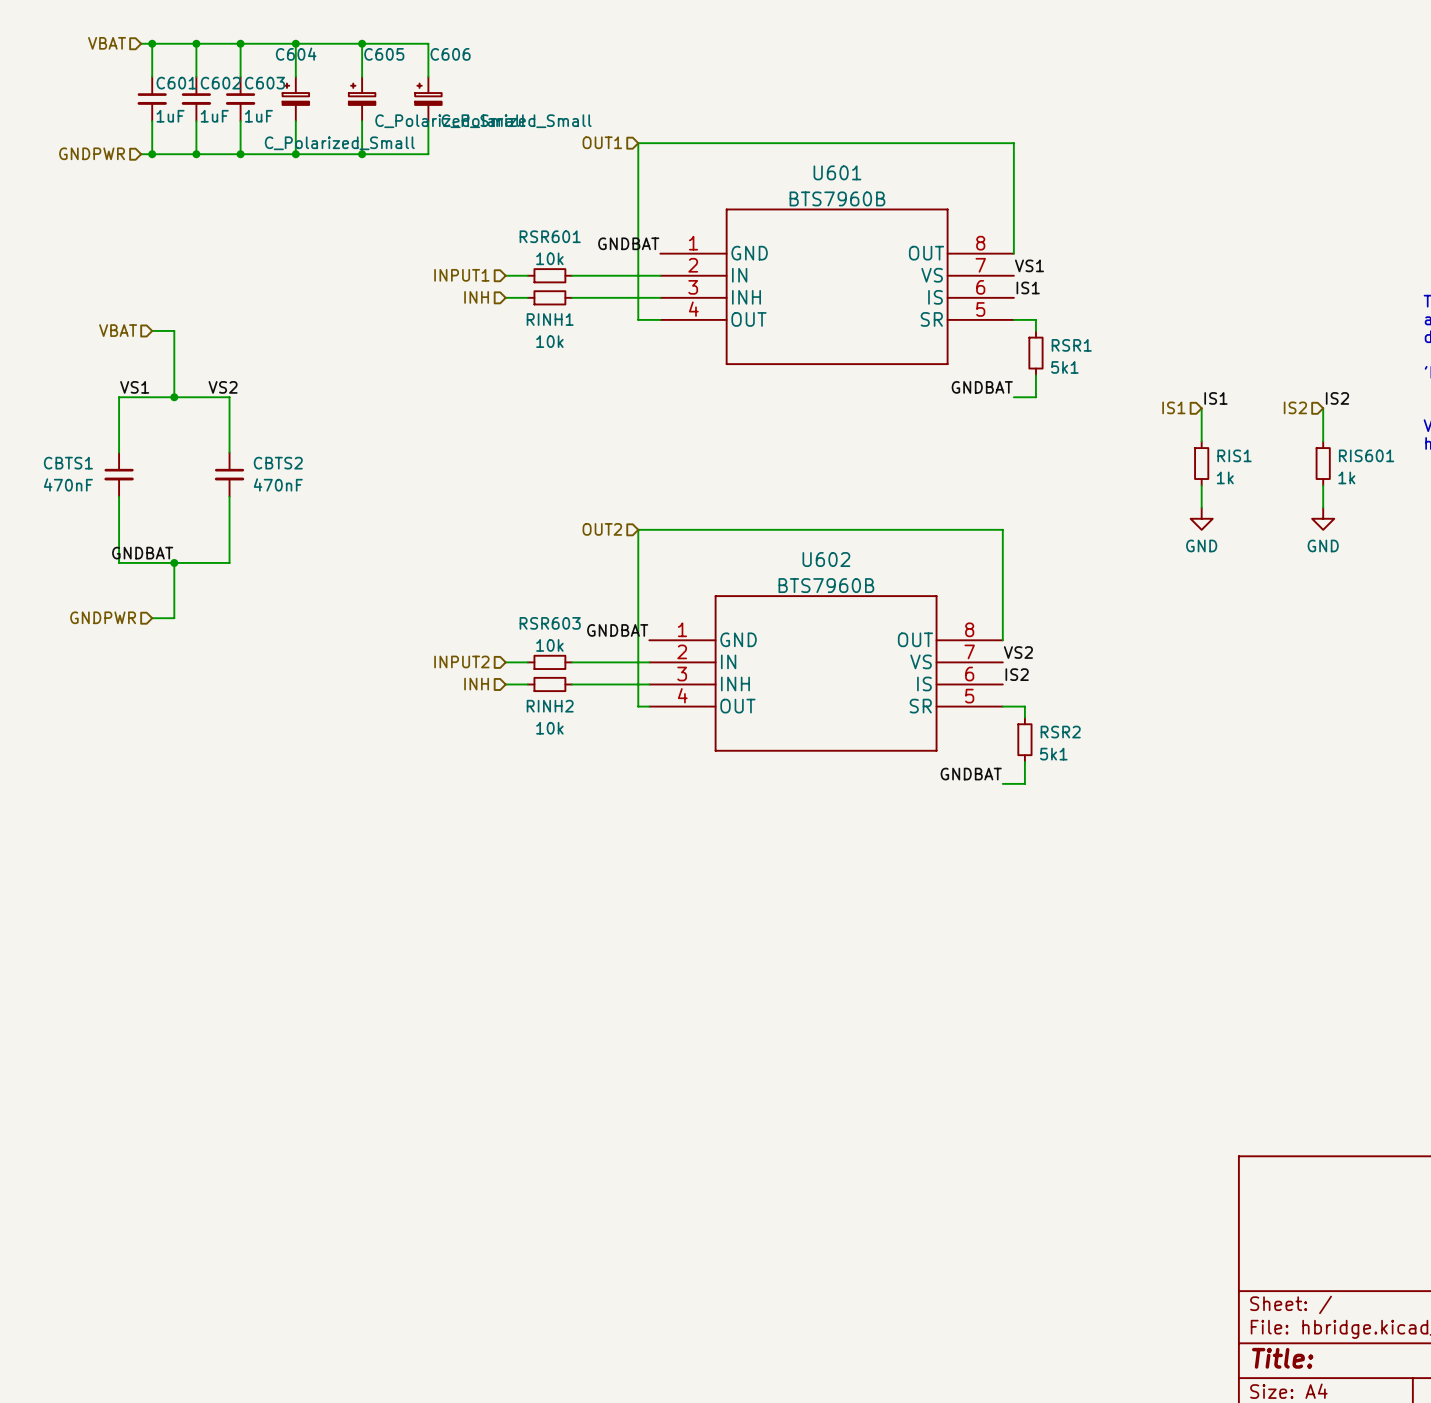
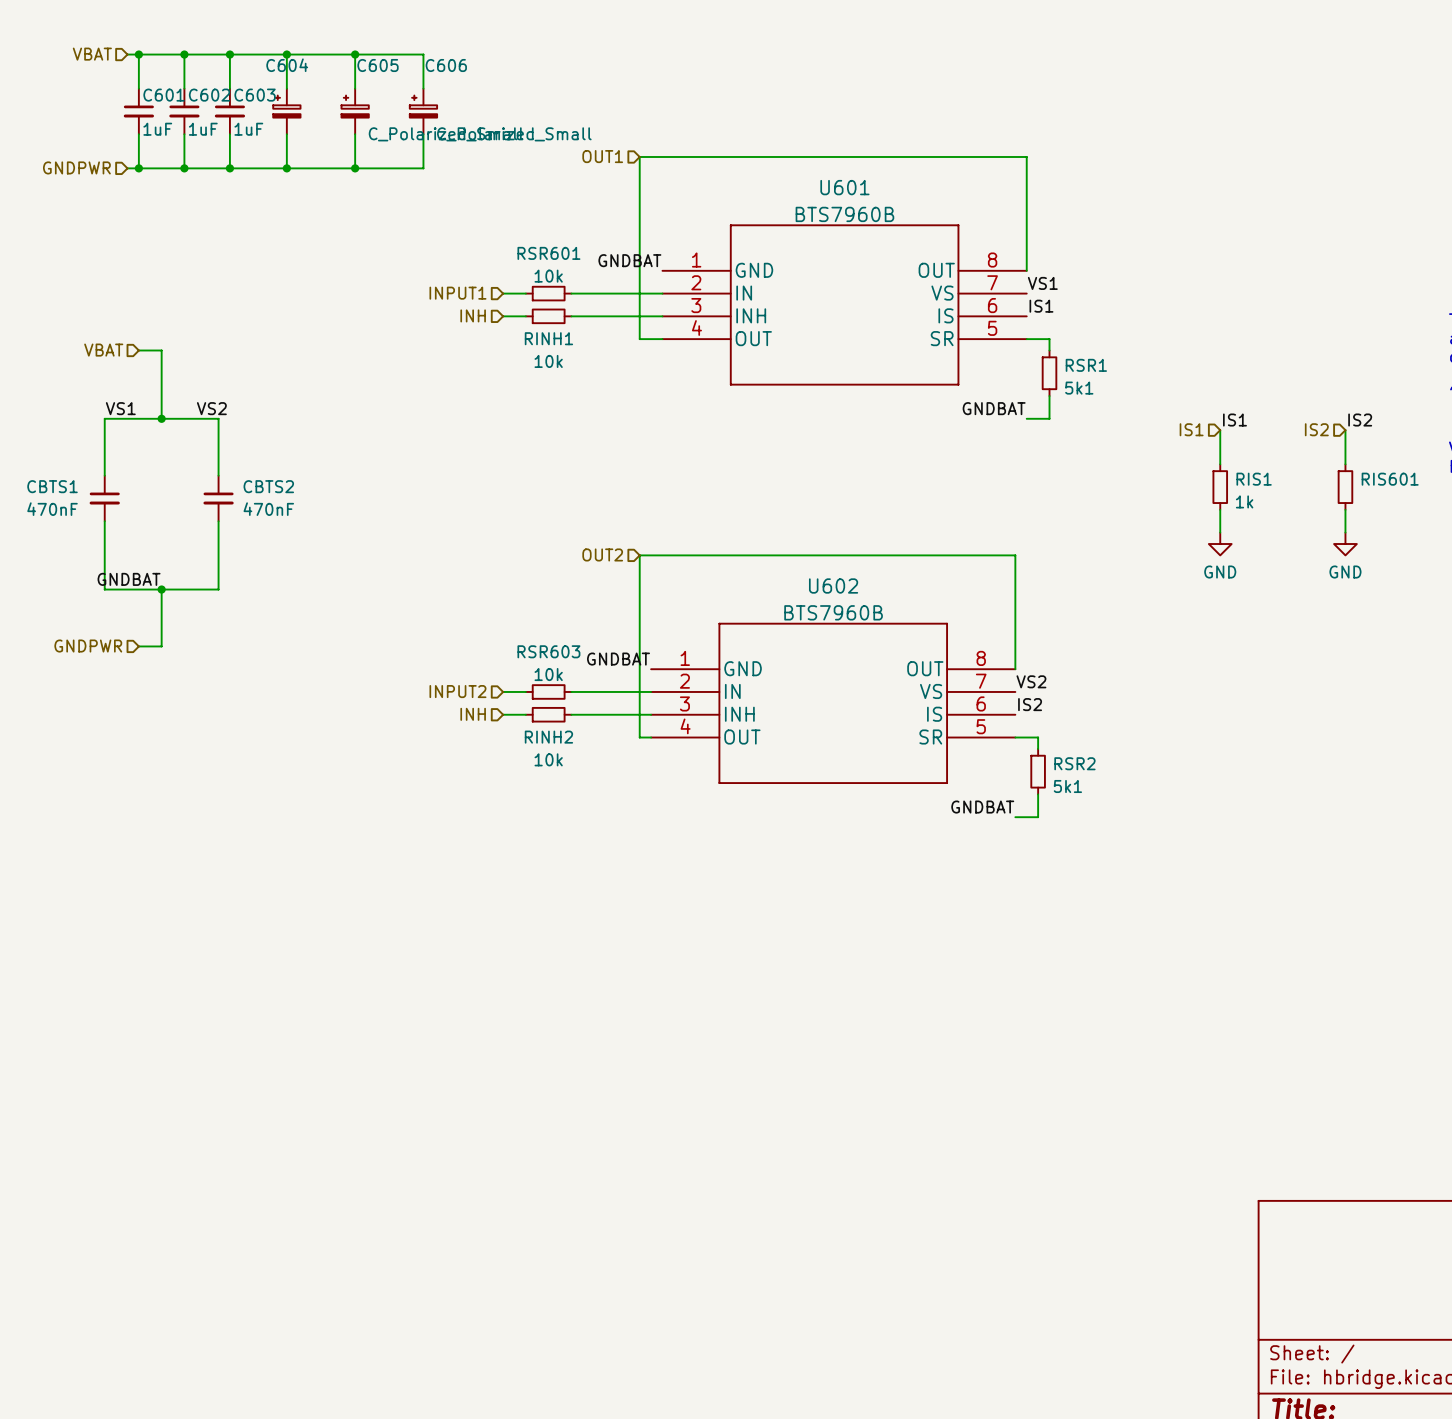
C604 value: C_Polarized_Small (339, 143) -> none
RIS601 value: 1k (1346, 477) -> none

